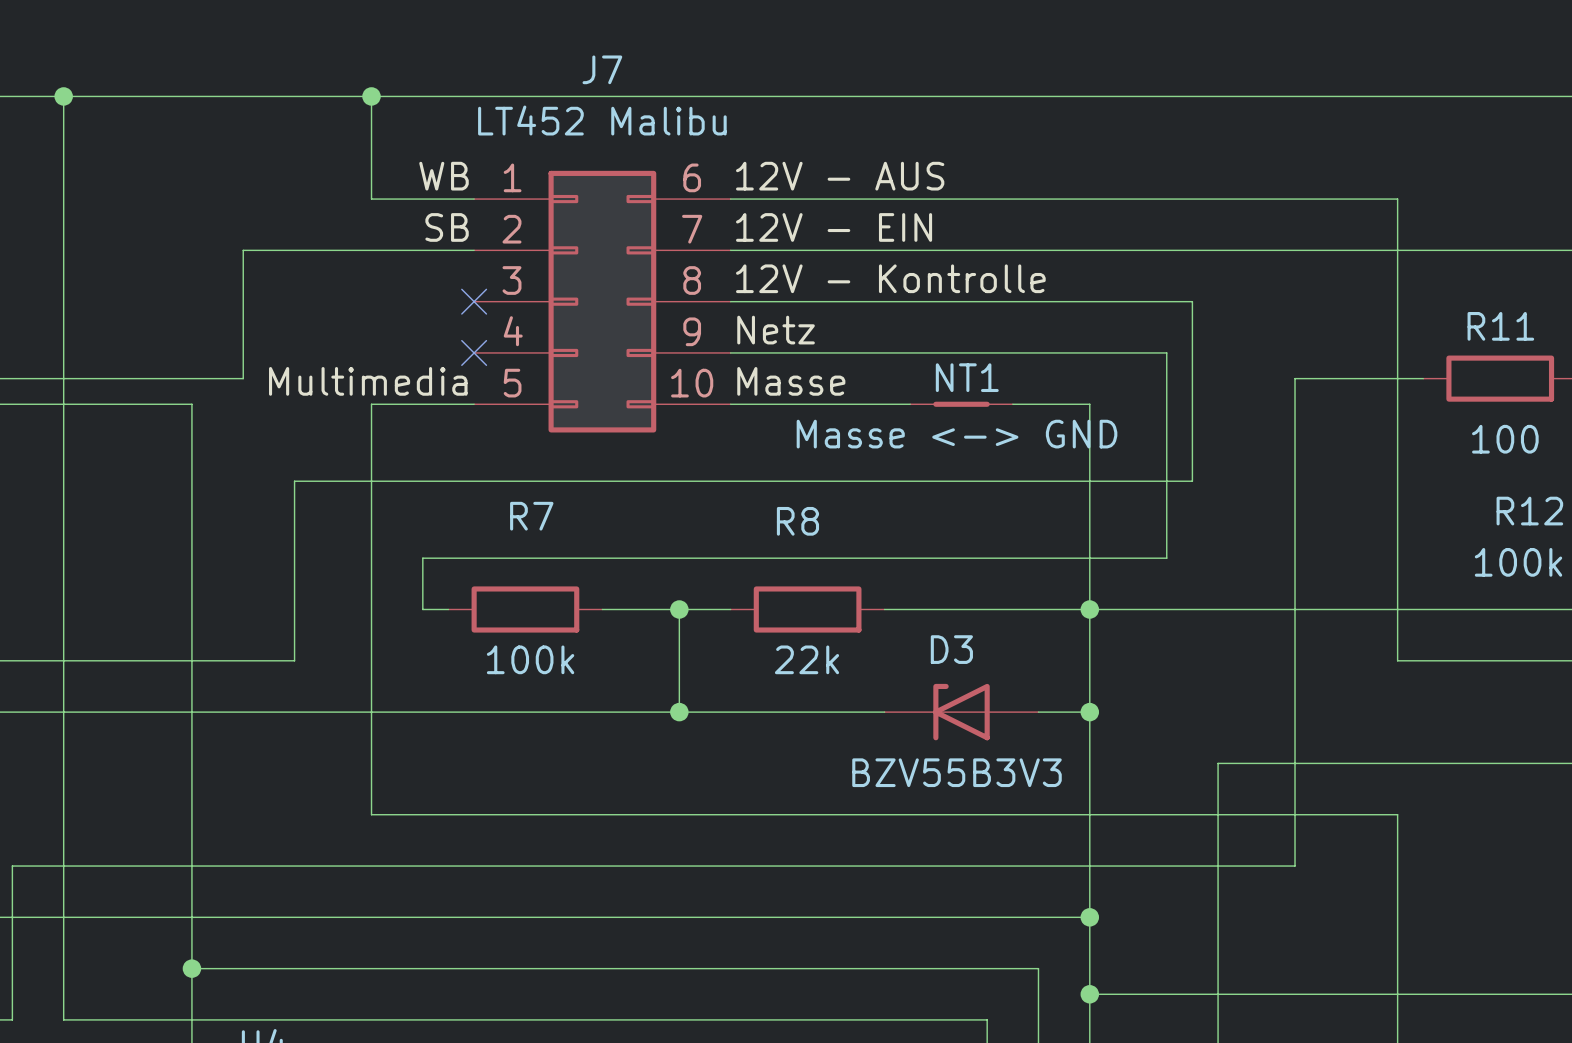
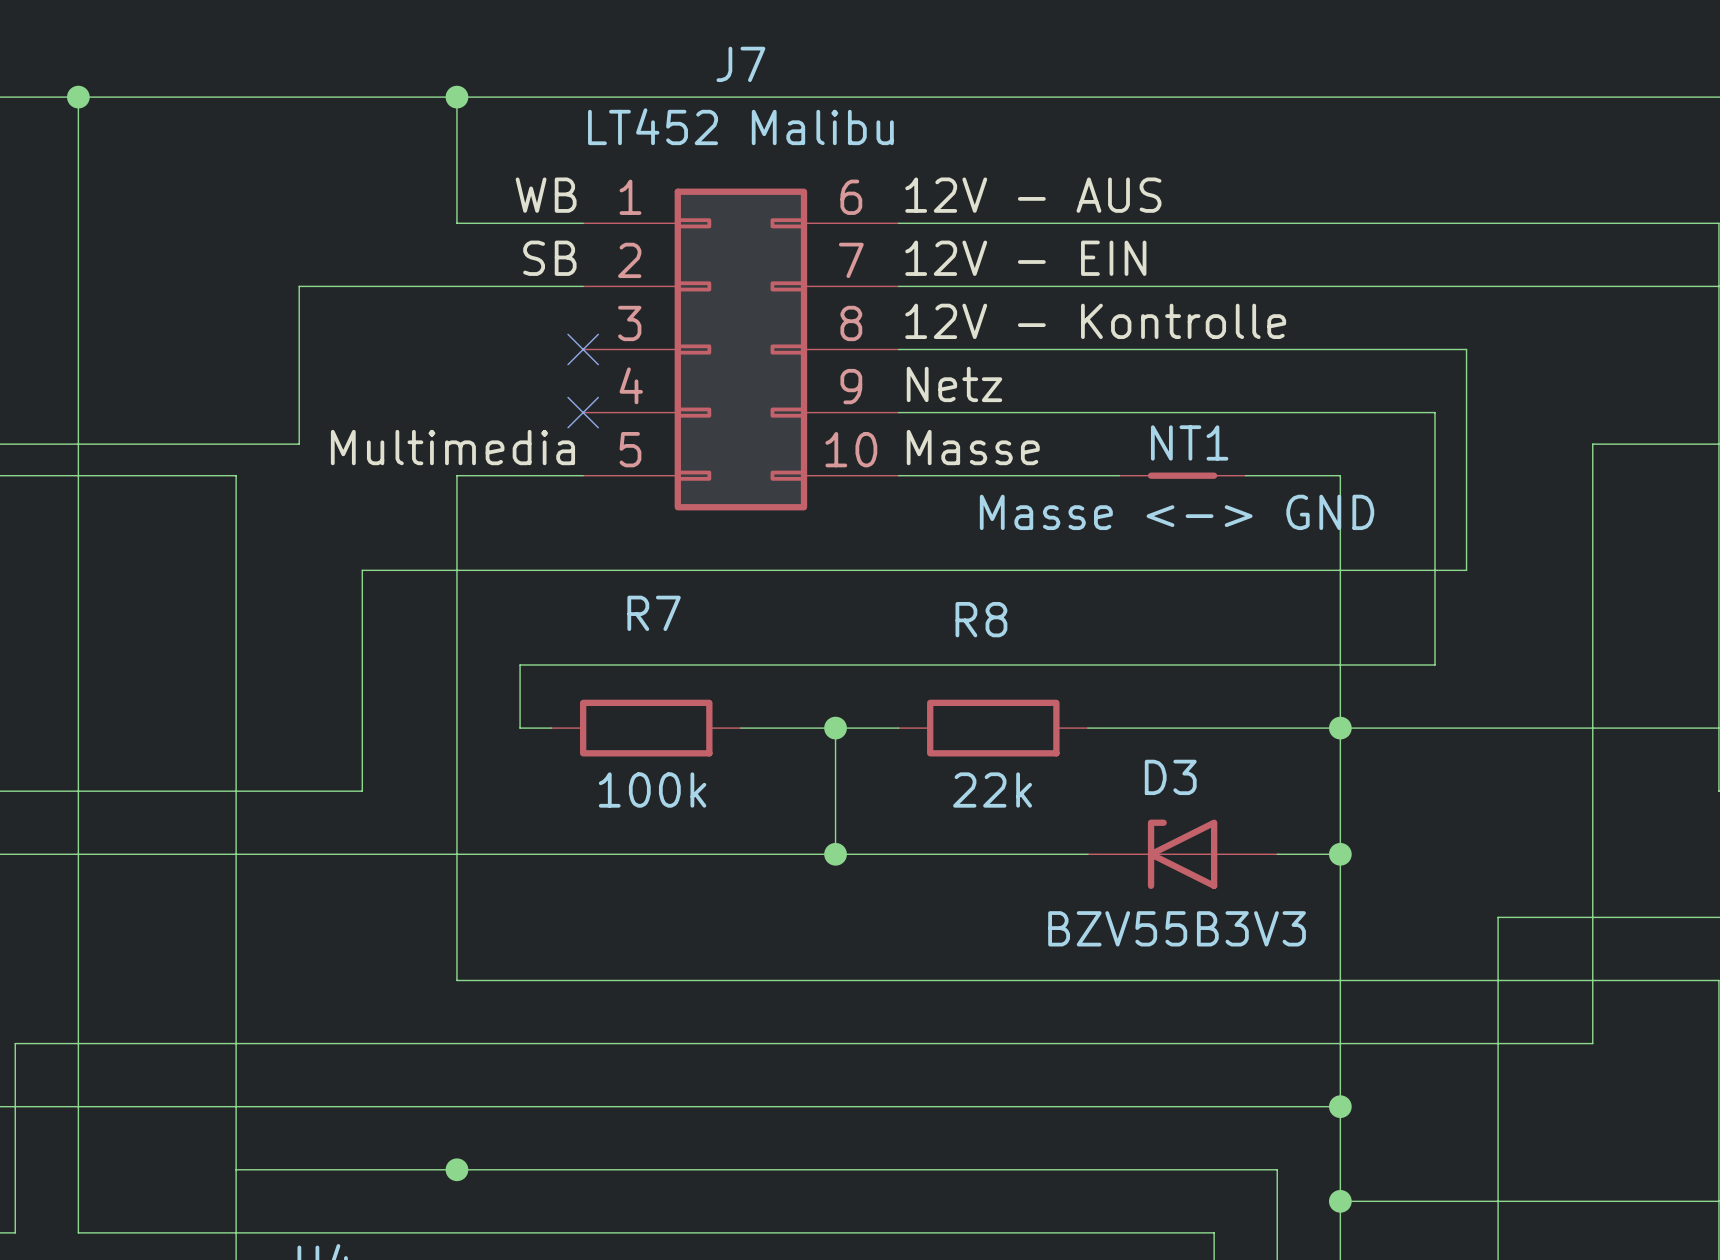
junction: (191, 968) -> none
junction: none -> (456, 1169)

